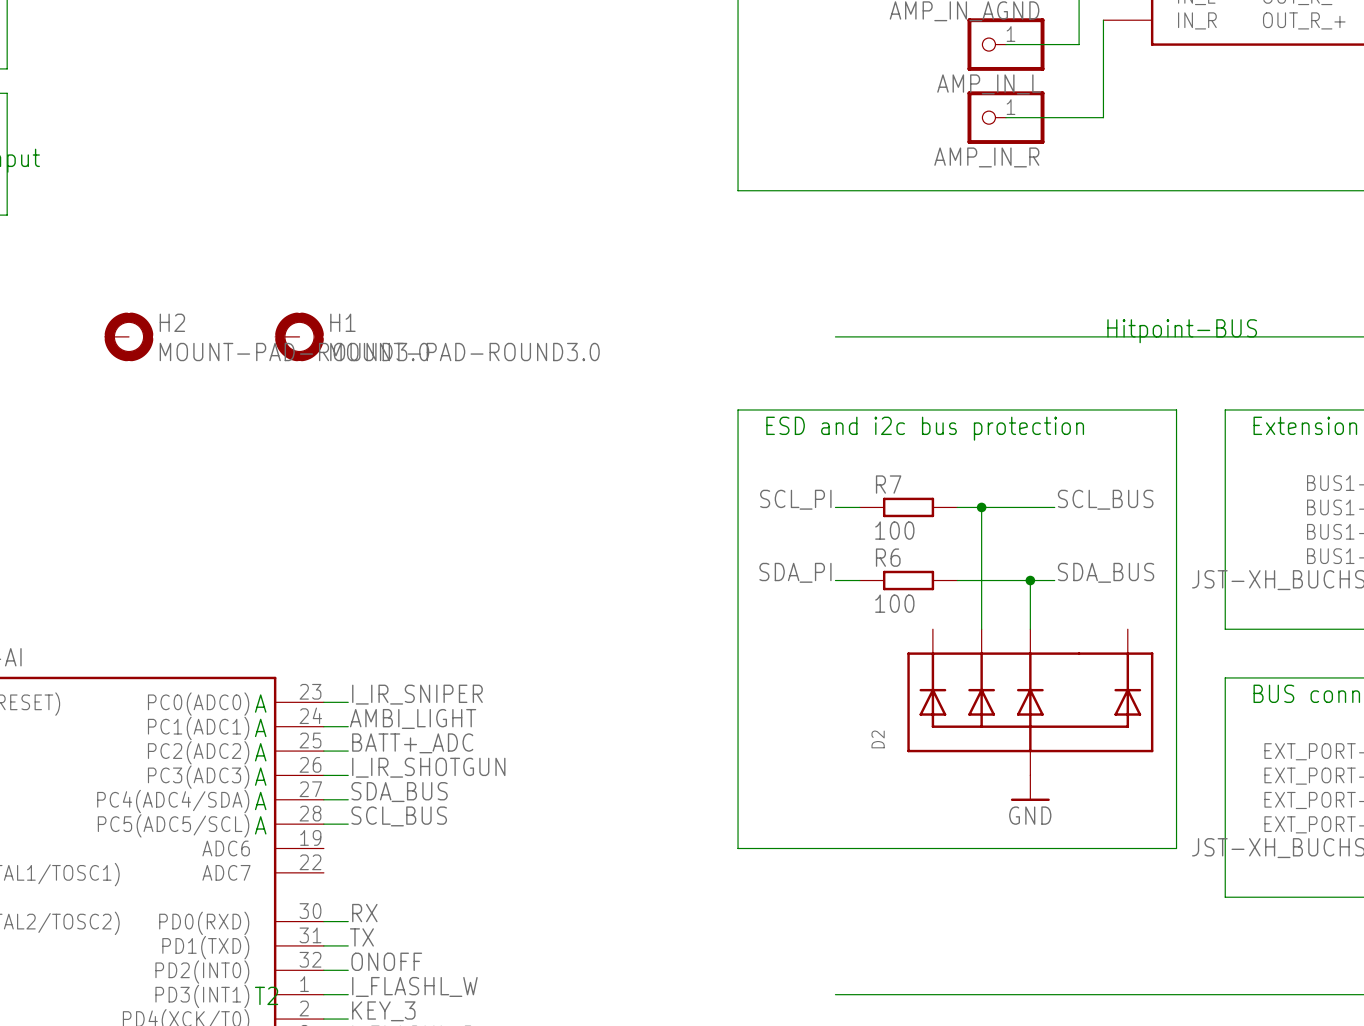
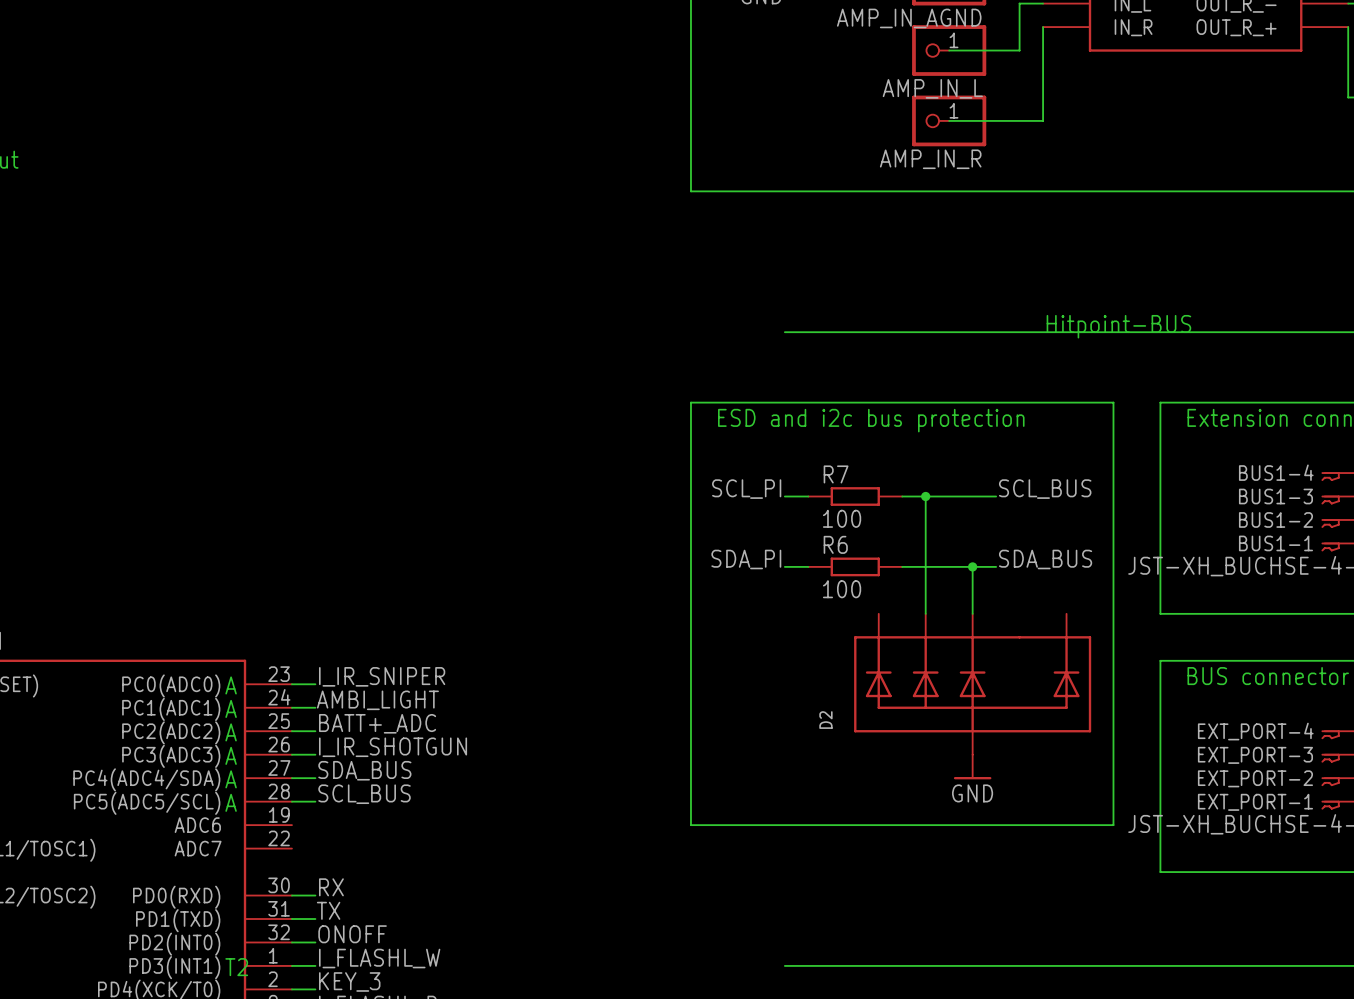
H2: MOUNT-PAD-ROUND3.0 (128, 336) -> none
H1: MOUNT-PAD-ROUND3.0 (299, 336) -> none

